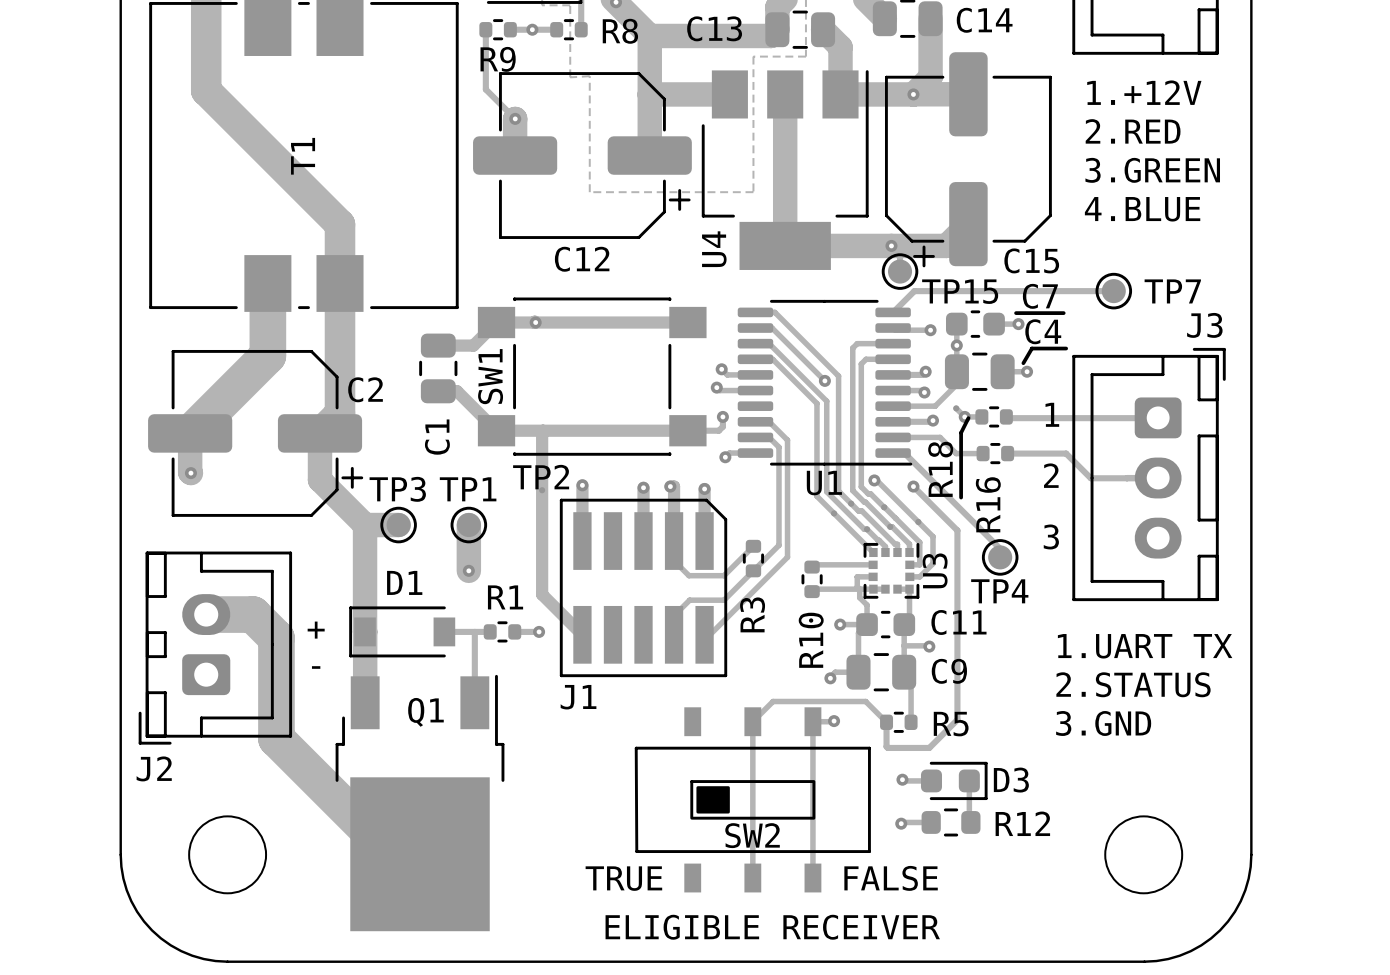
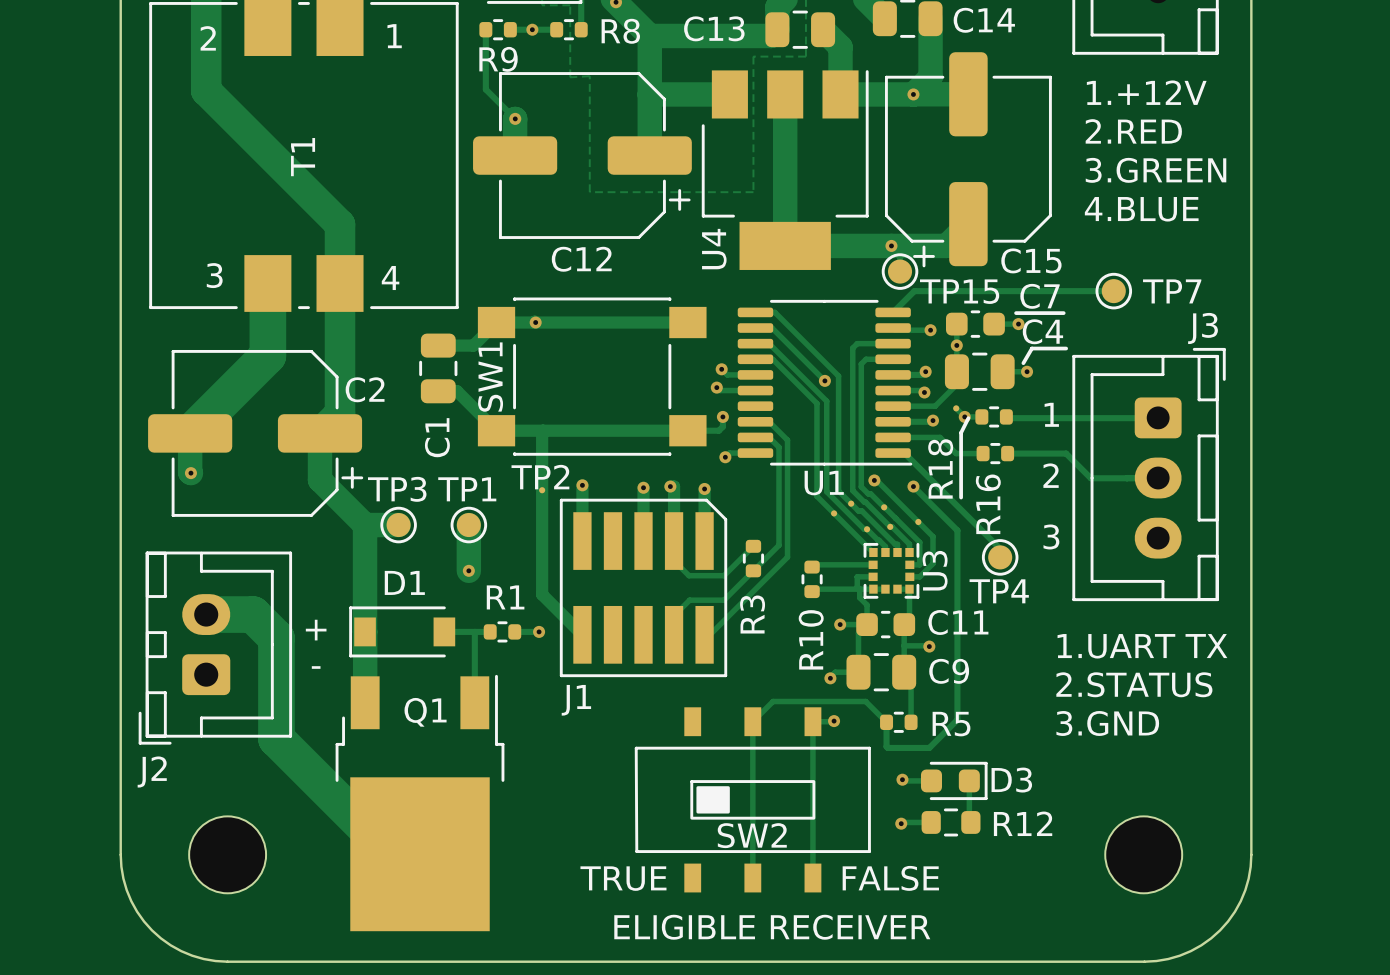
text: none -> 1 (394, 36)
text: none -> 2 (208, 38)
text: none -> 3 (214, 275)
text: none -> 4 (390, 278)

